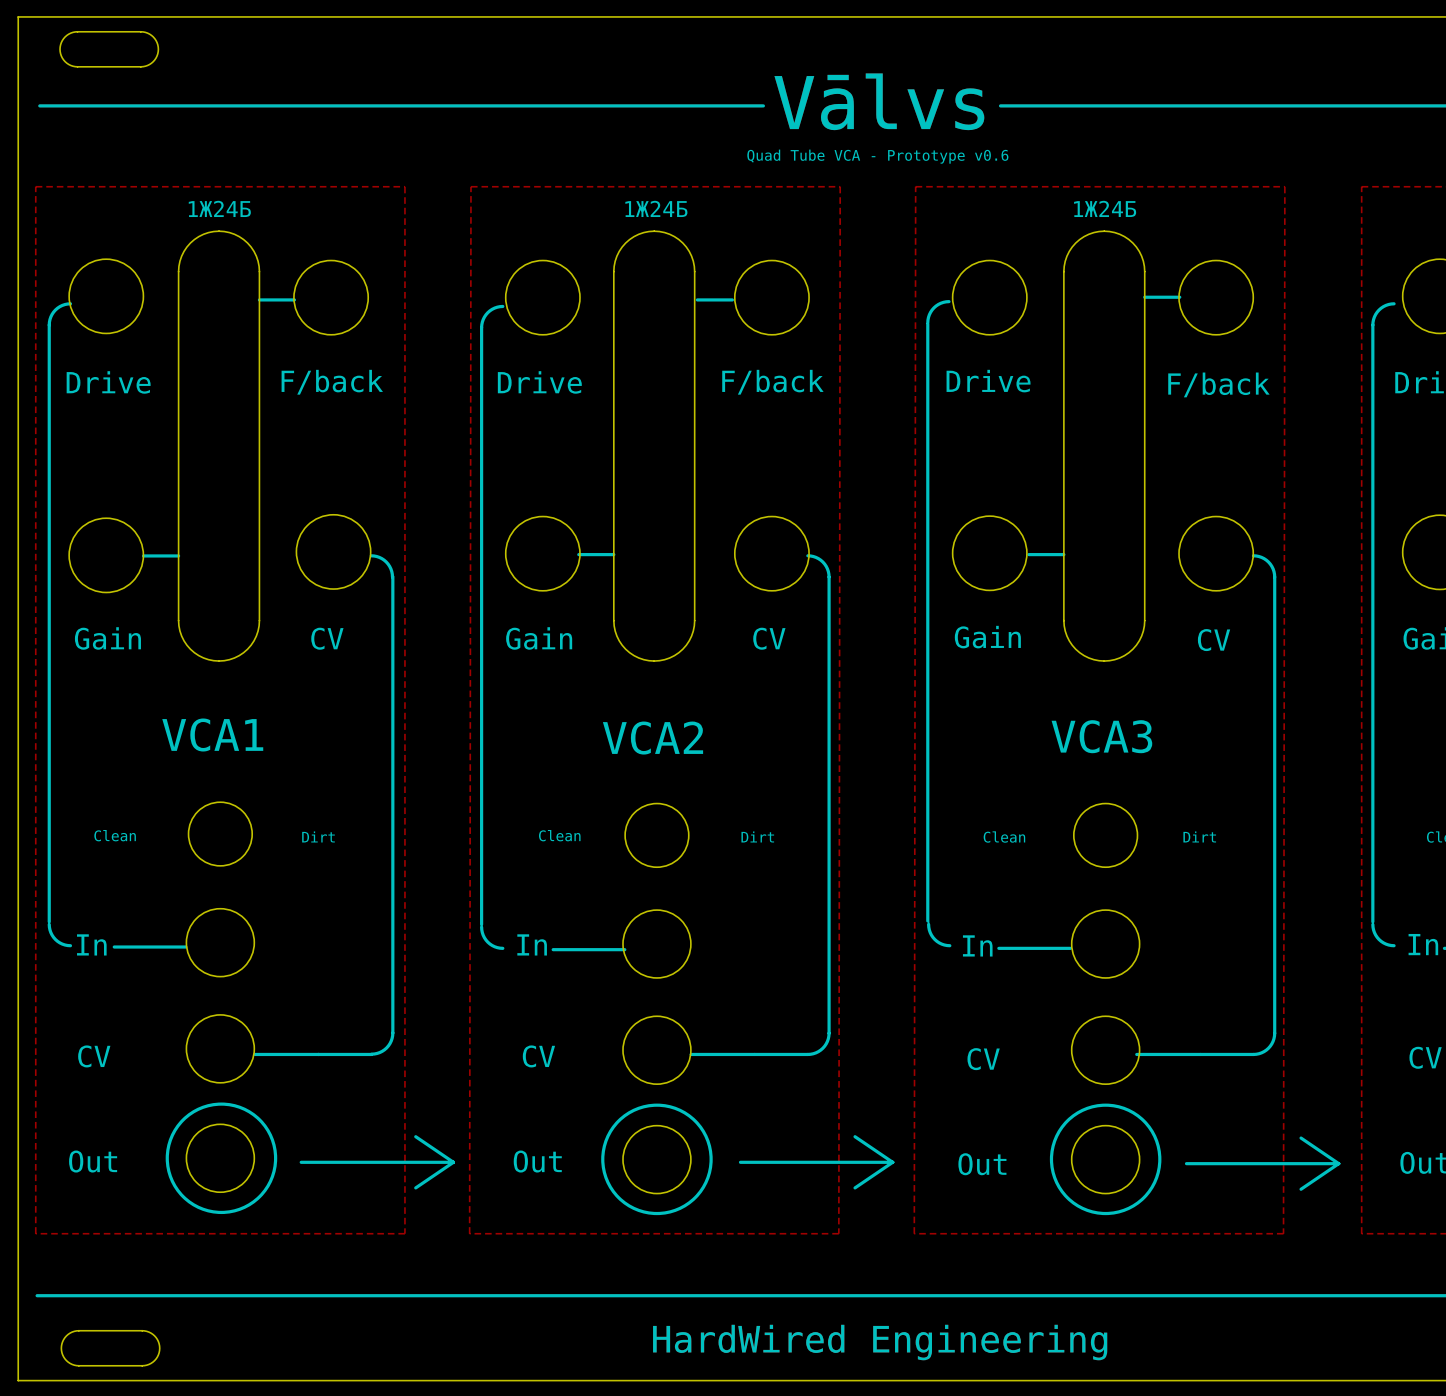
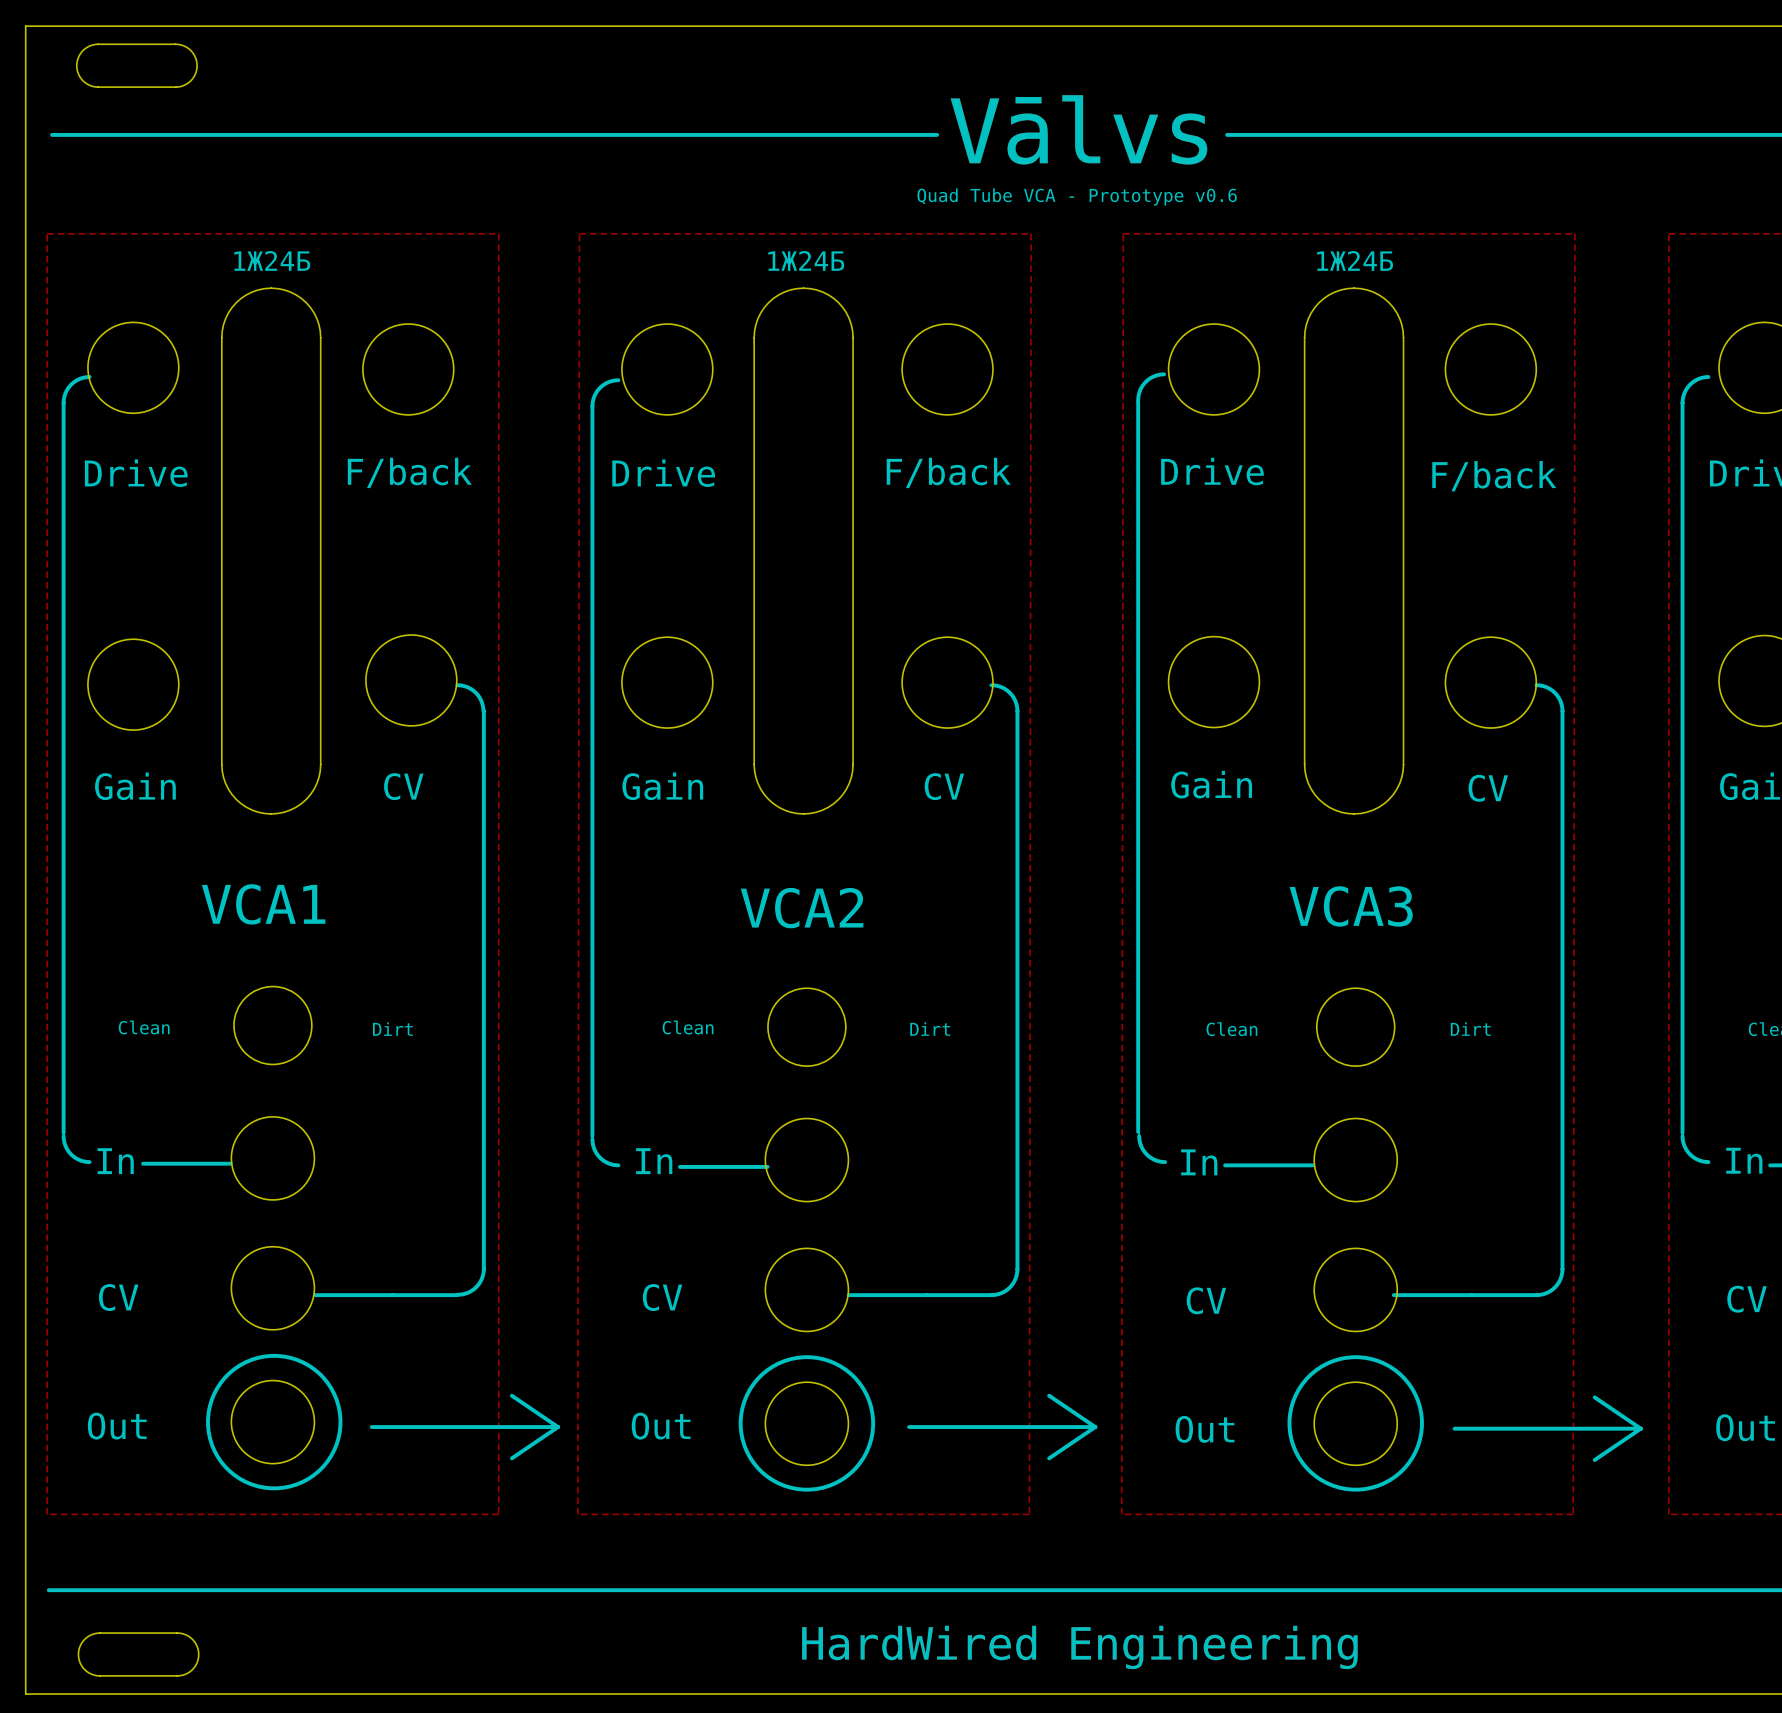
line: (1144, 297) (1179, 297) -> none
line: (259, 299) (294, 299) -> none
line: (697, 299) (732, 299) -> none
line: (578, 554) (613, 554) -> none
line: (1028, 554) (1063, 554) -> none
line: (143, 555) (178, 555) -> none

